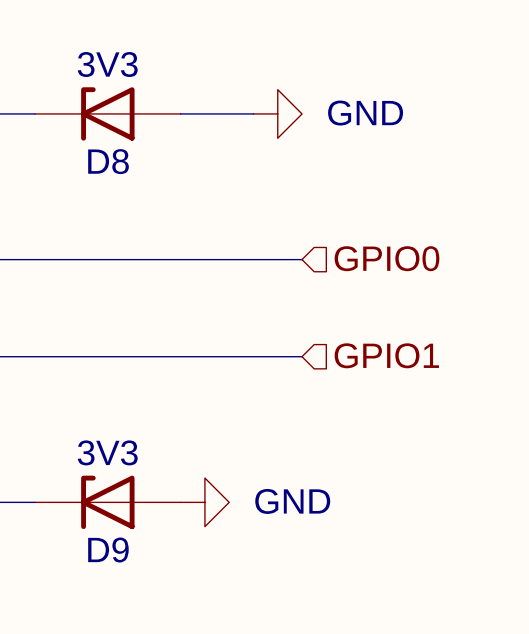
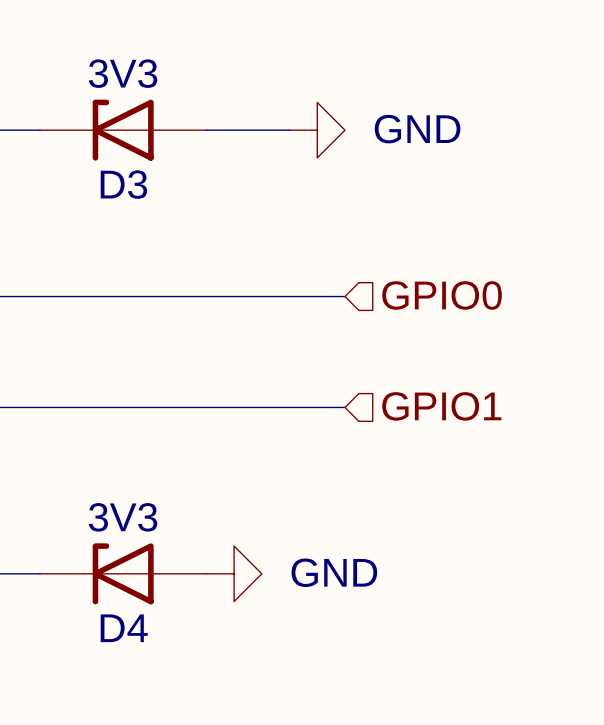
D8 name: D8 (108, 161) -> D3 (123, 184)
D9 name: D9 (108, 550) -> D4 (124, 628)

